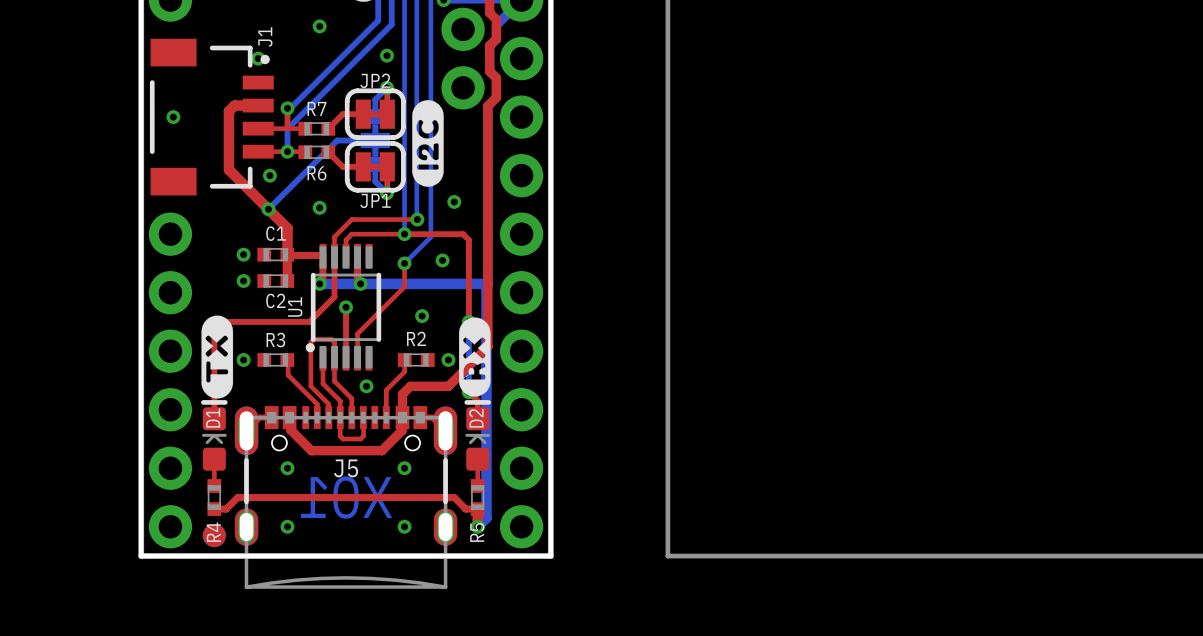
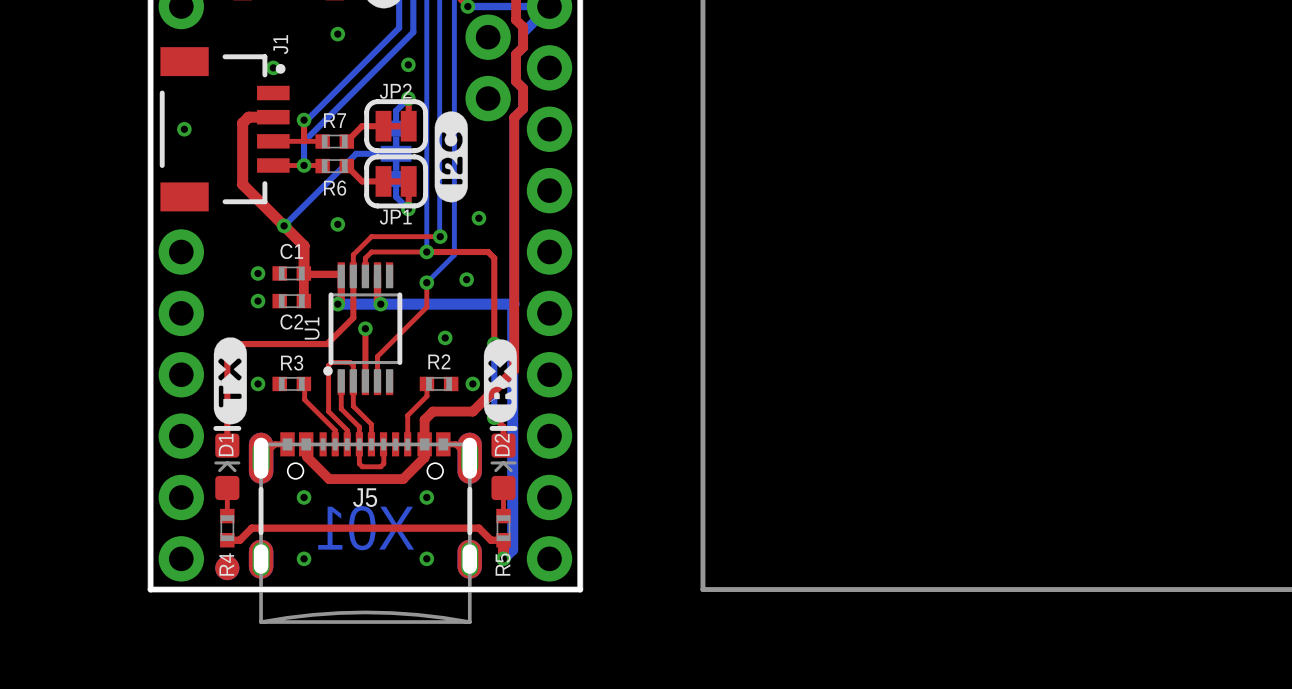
via: (269, 175) -> none
via: (366, 386) -> none

